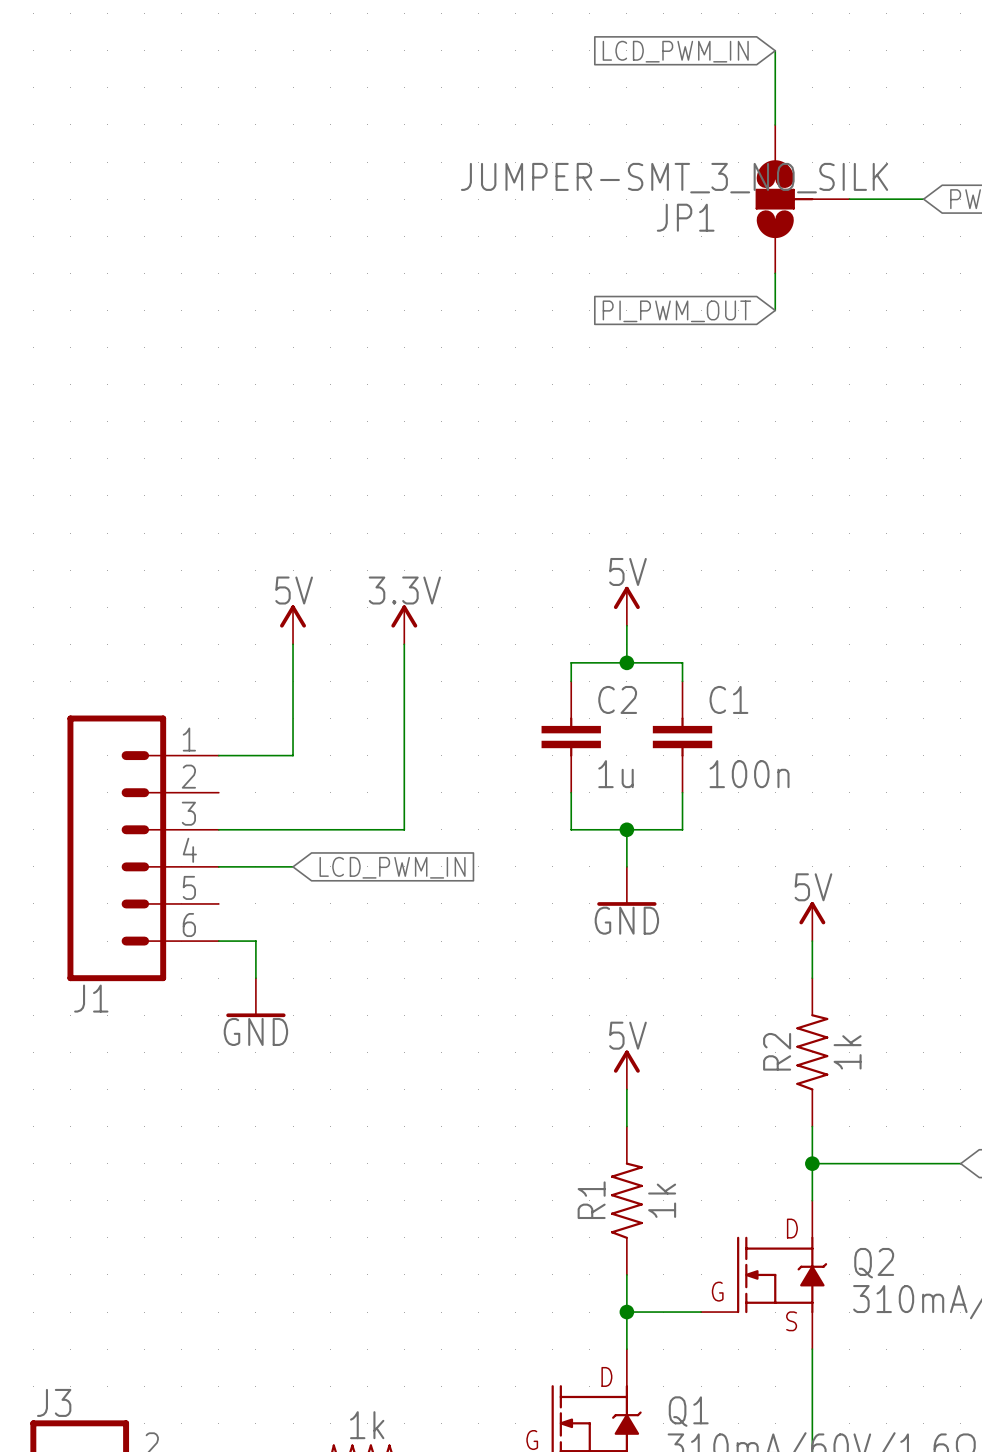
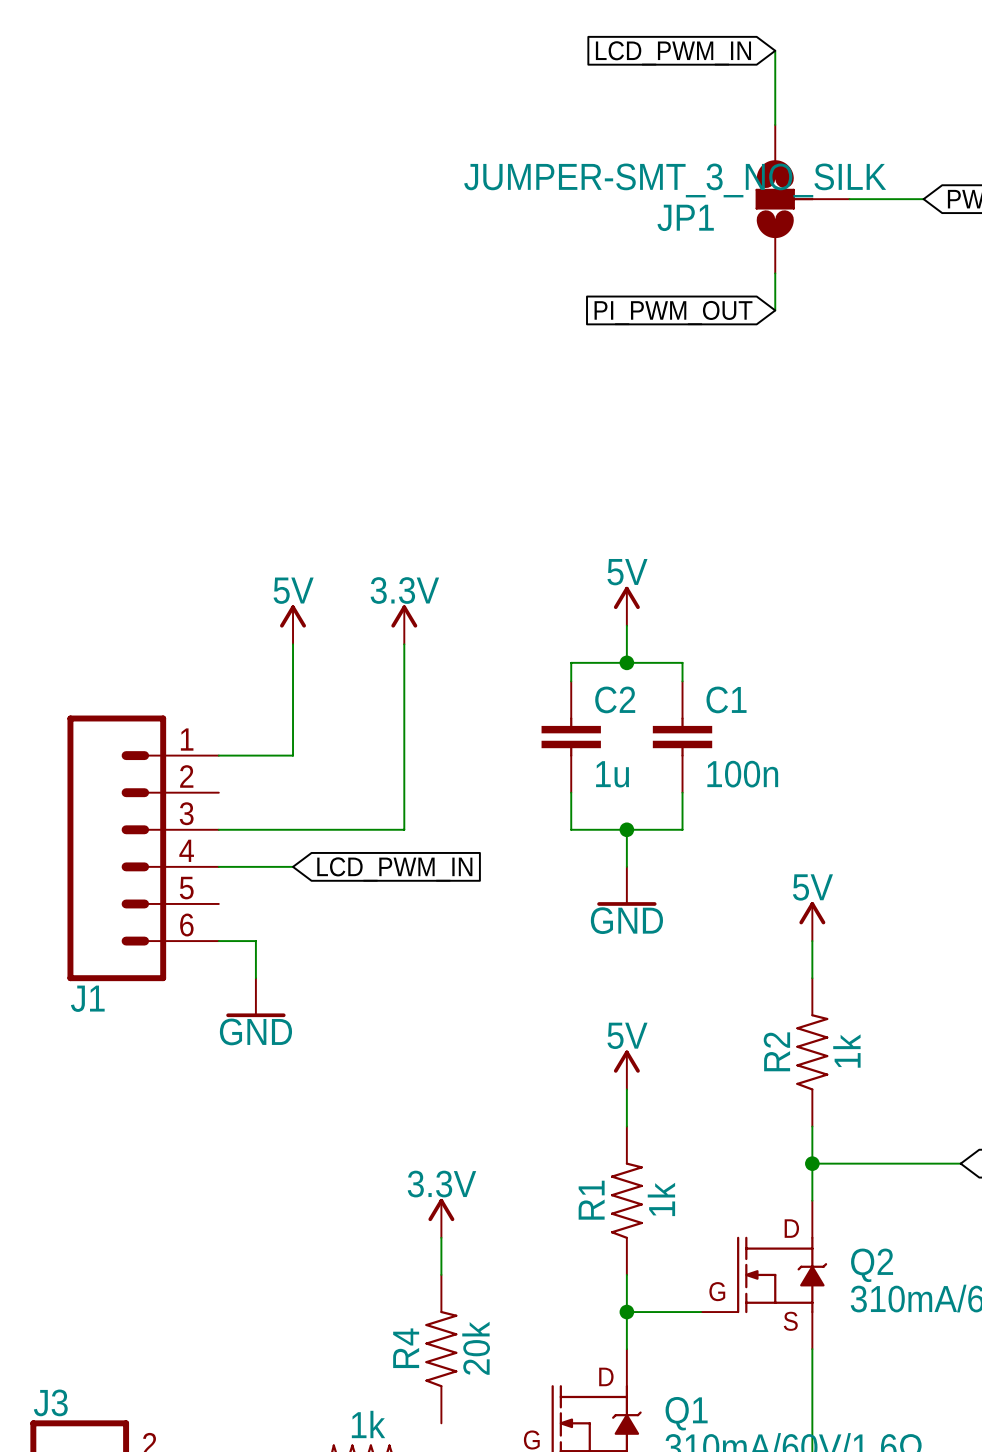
power symbol: none -> 3.3V (441, 1218)
wire: none -> (441, 1237) (441, 1274)
R4: none -> 20k (441, 1349)

